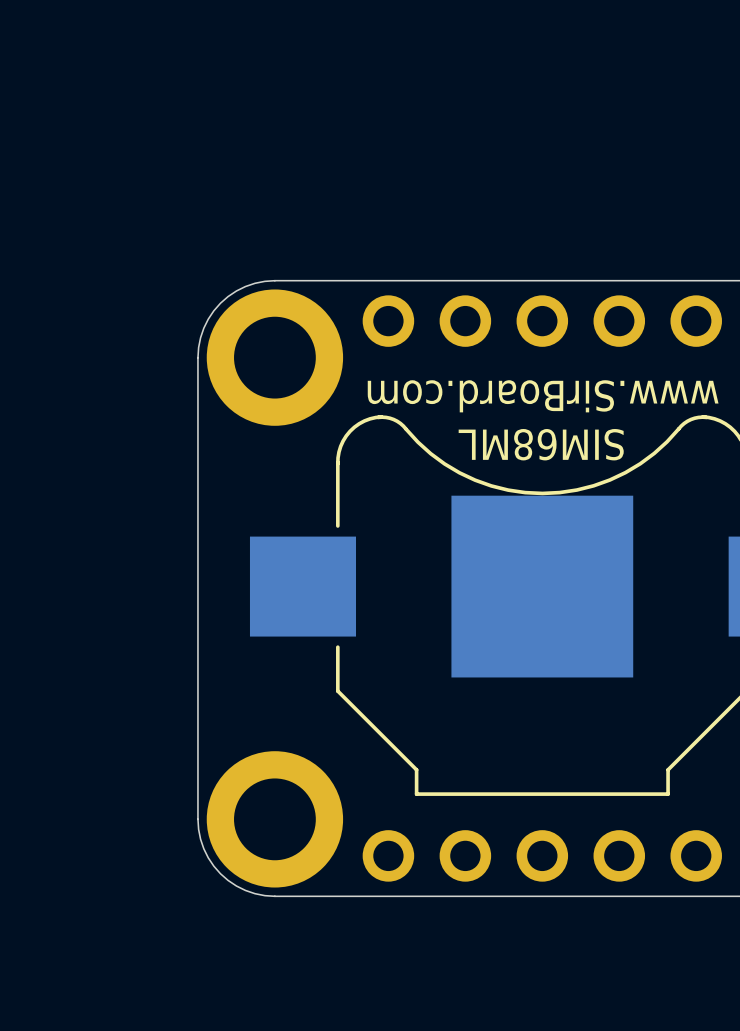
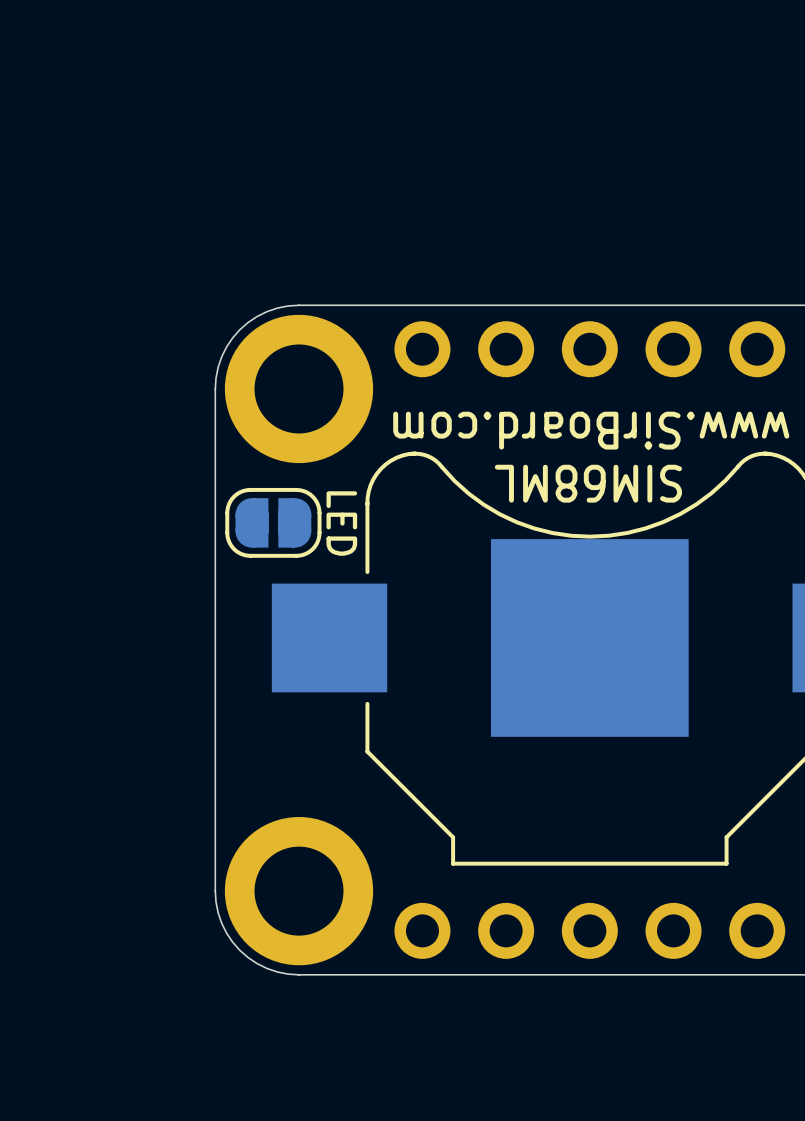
LED: none -> (273, 522)

